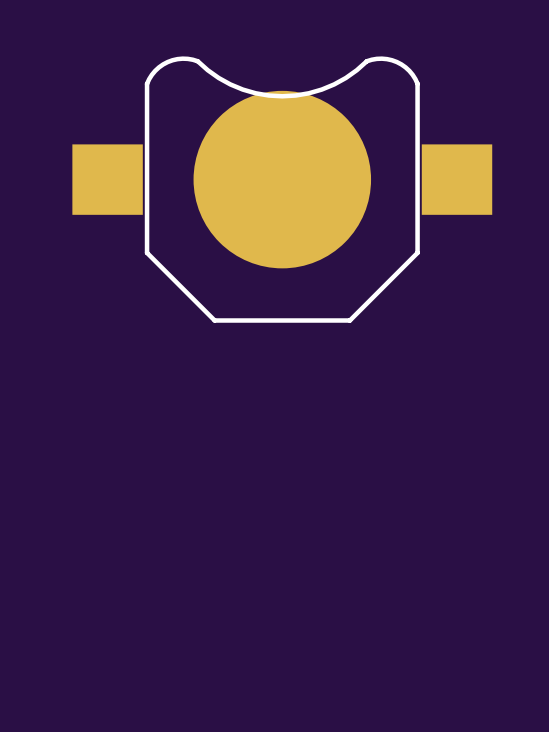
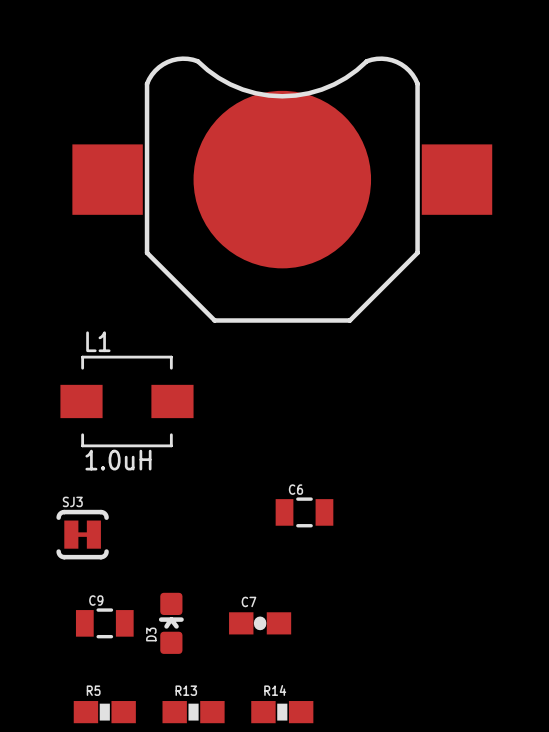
L1: none -> 1.0uH (126, 401)
C6: none -> (304, 512)
SJ3: none -> (82, 534)
C9: none -> (104, 623)
D3: none -> (171, 623)
C7: none -> (260, 623)
R5: none -> (104, 712)
R13: none -> (193, 712)
R14: none -> (282, 712)

